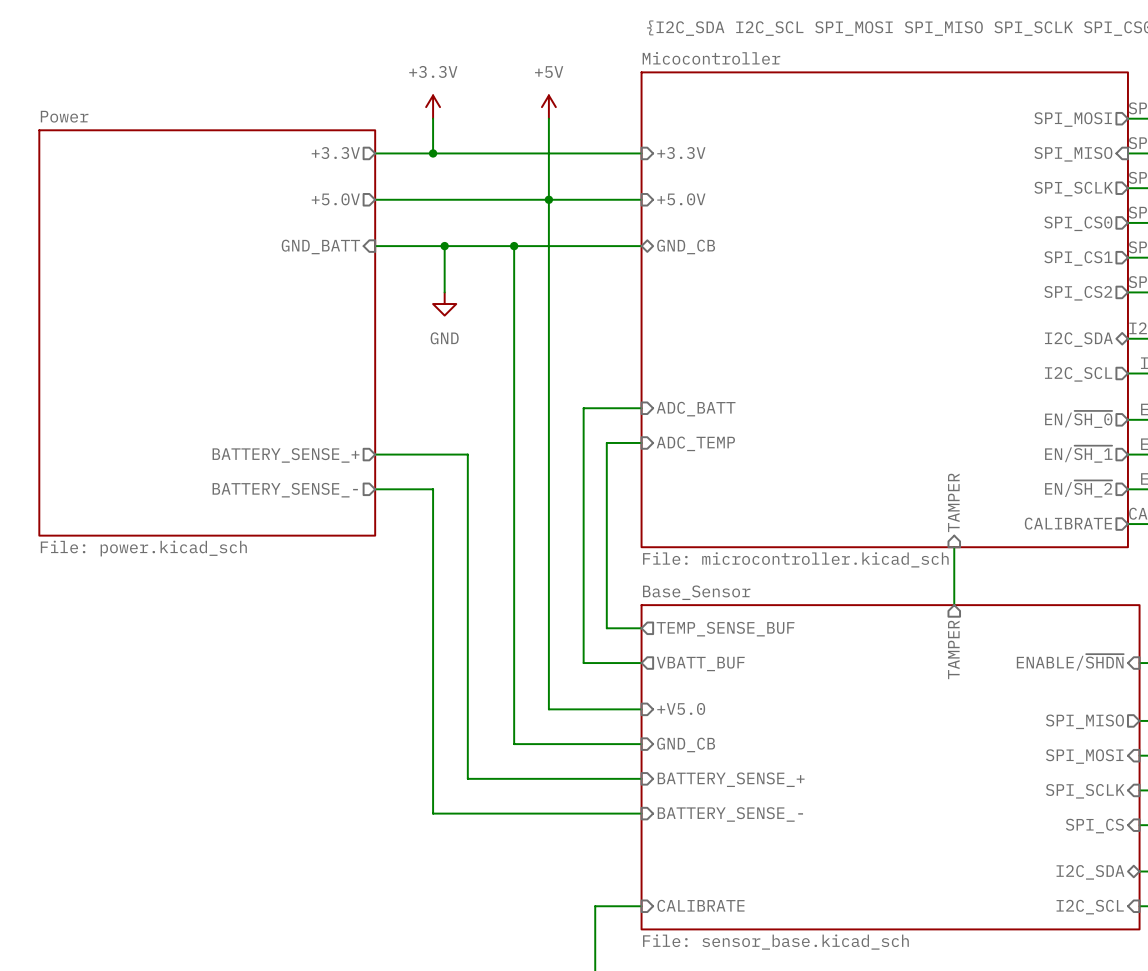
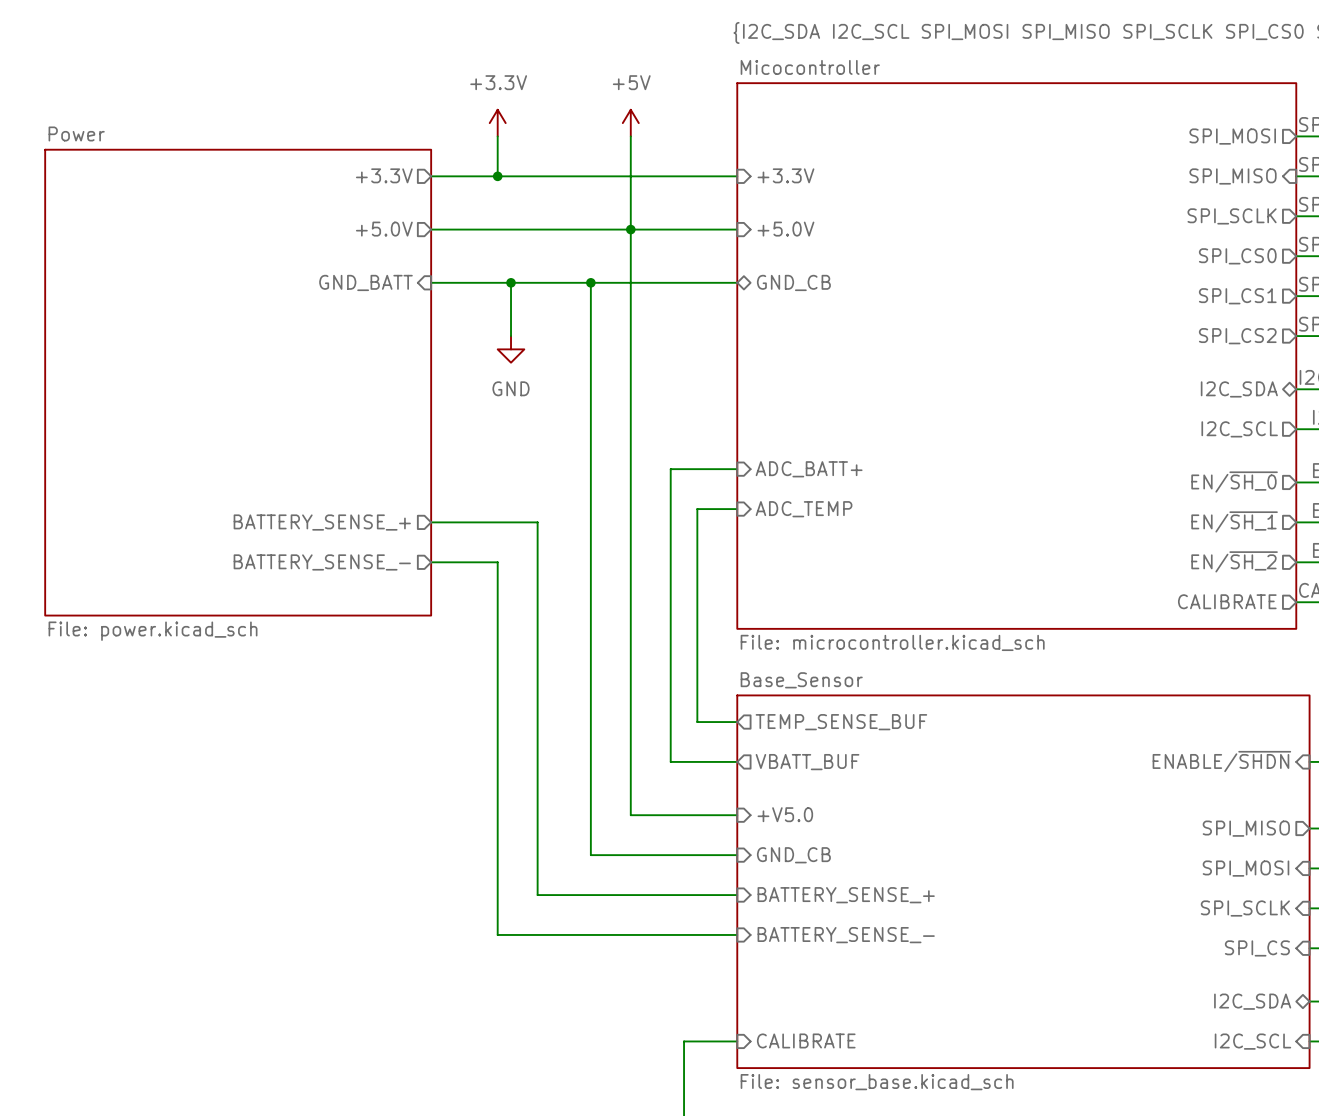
sheet pin: ADC_BATT (696, 409) -> ADC_BATT+ (809, 469)
sheet pin: TAMPER (953, 502) -> none
wire: (954, 547) (954, 605) -> none
sheet pin: TAMPER (953, 649) -> none

